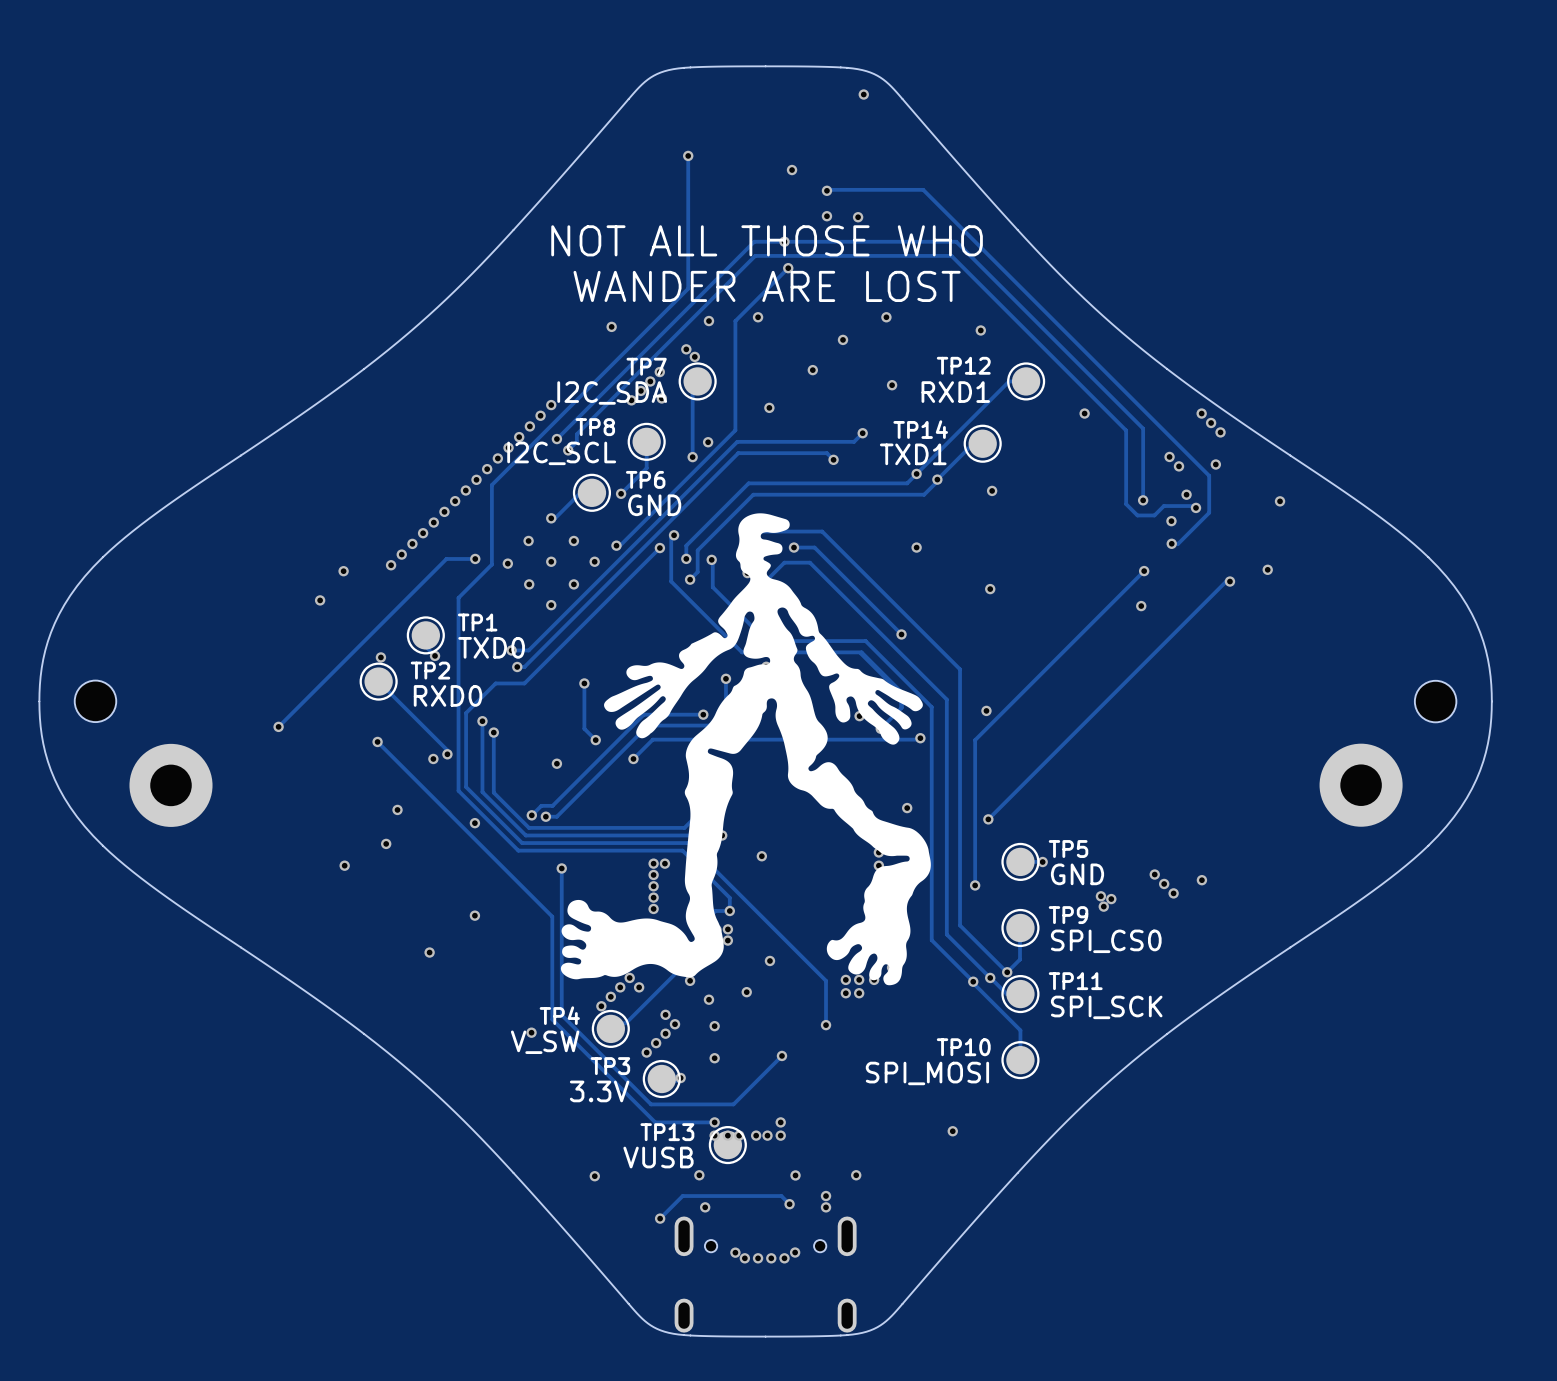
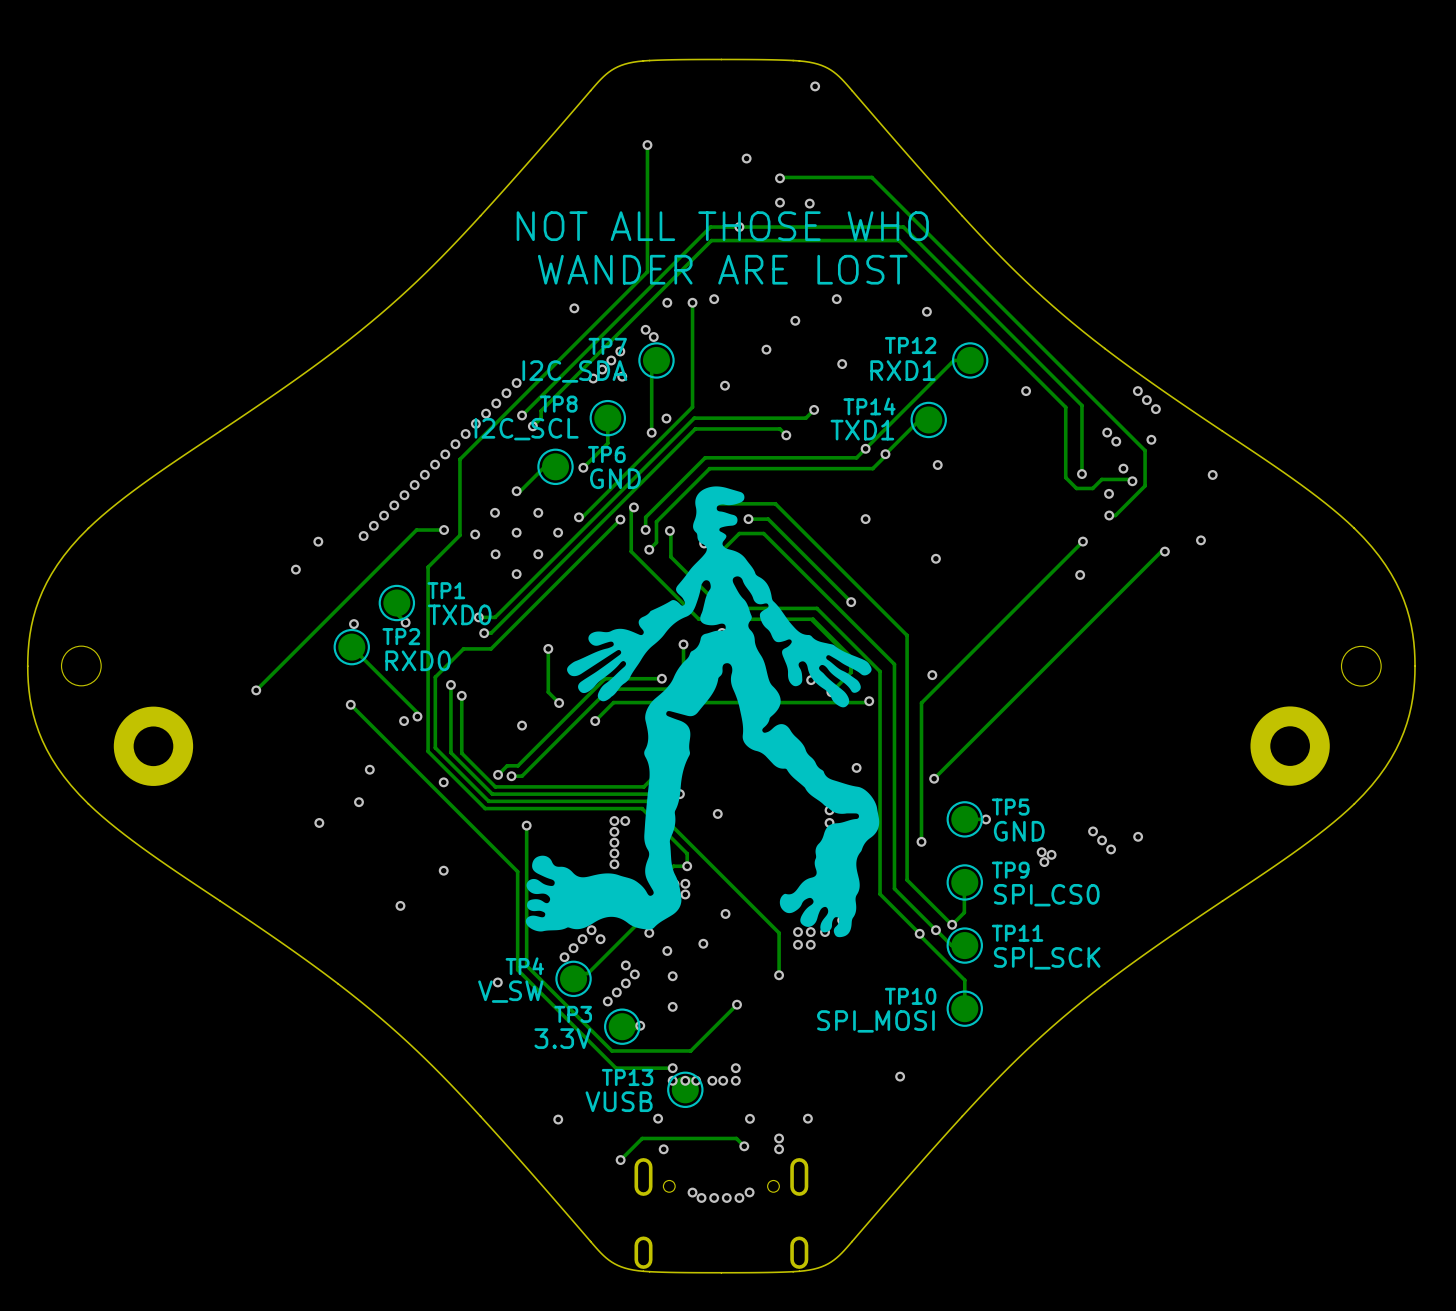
track: (788, 268) (735, 321) -> none
via position: (788, 268) -> (692, 302)

